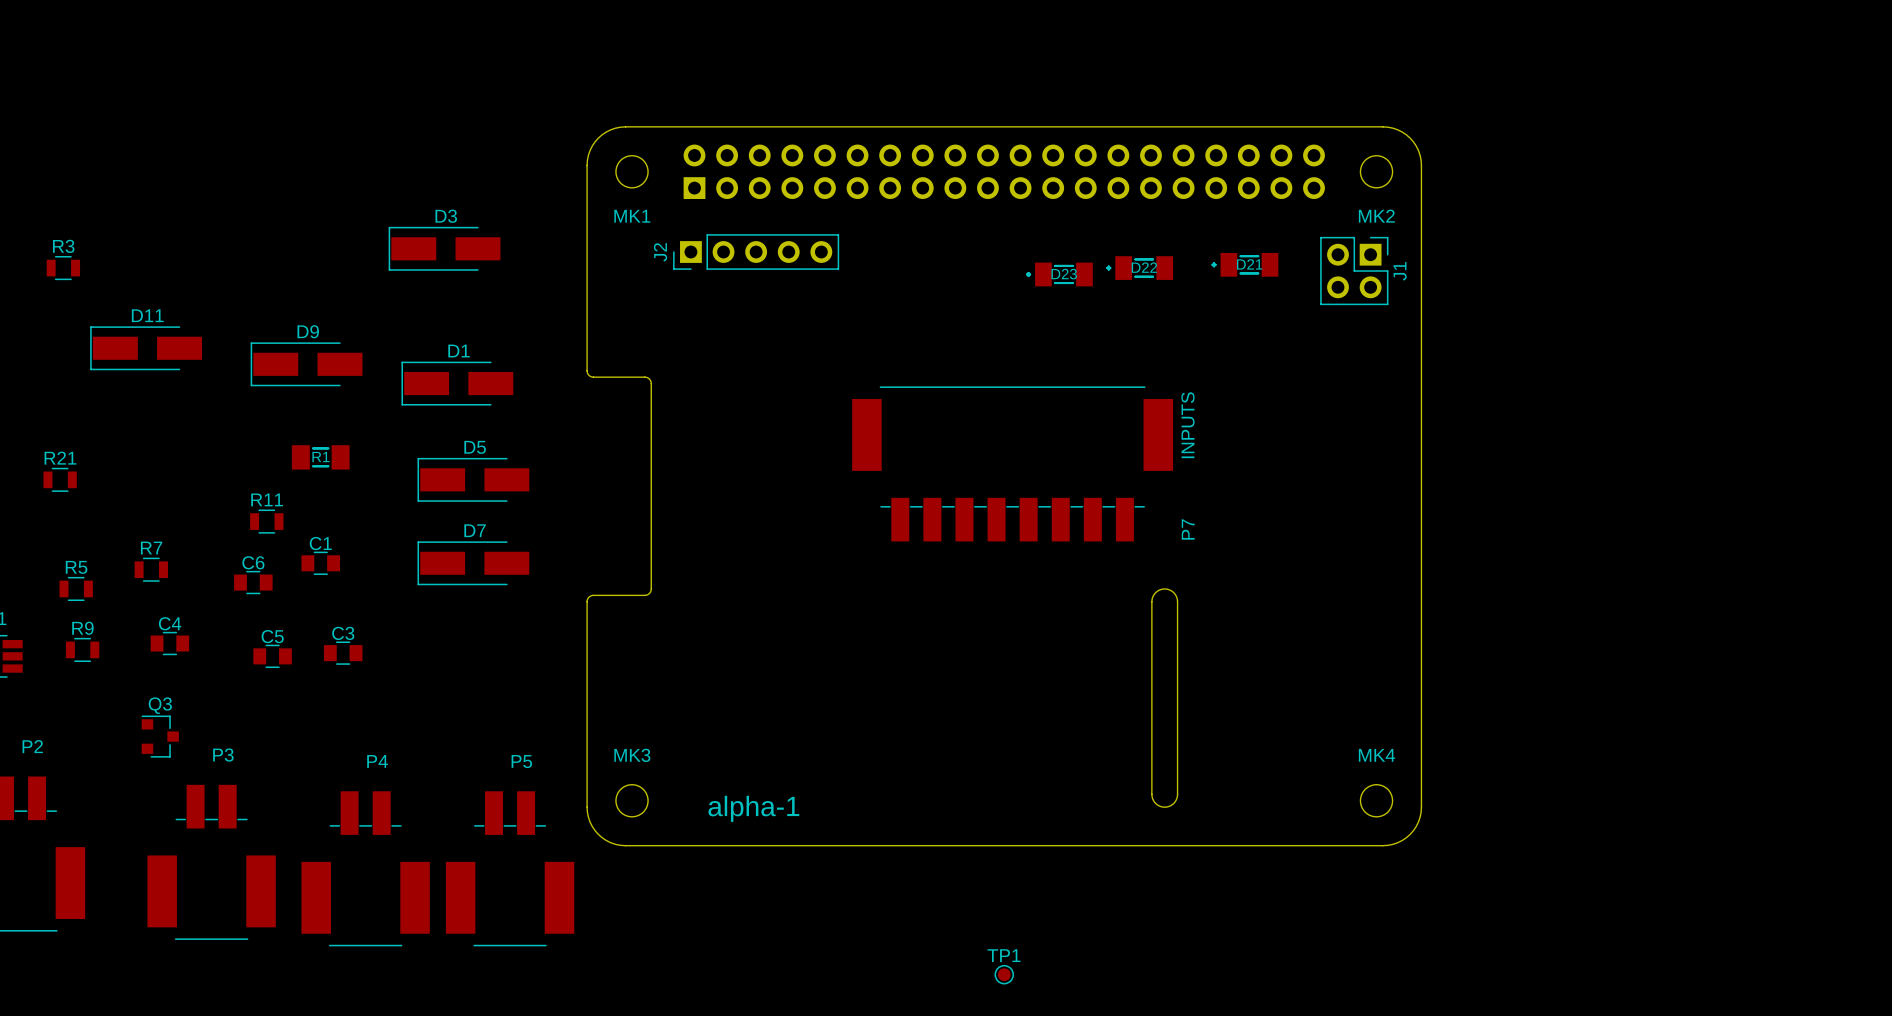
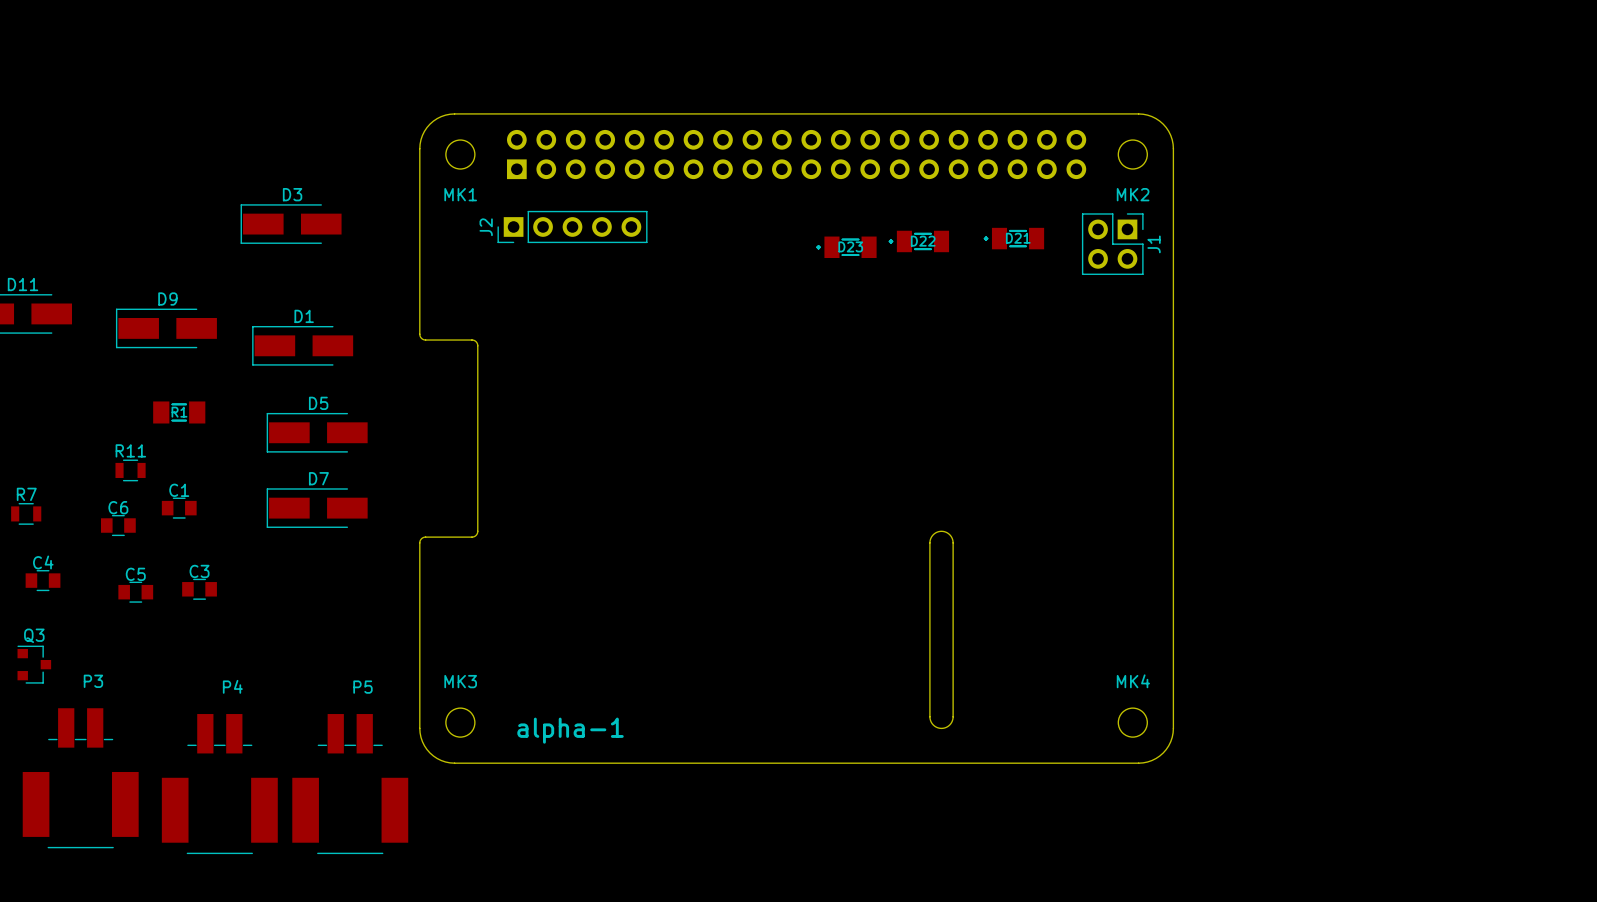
P7: INPUTS (1012, 463) -> none
TP1: (1004, 974) -> none

